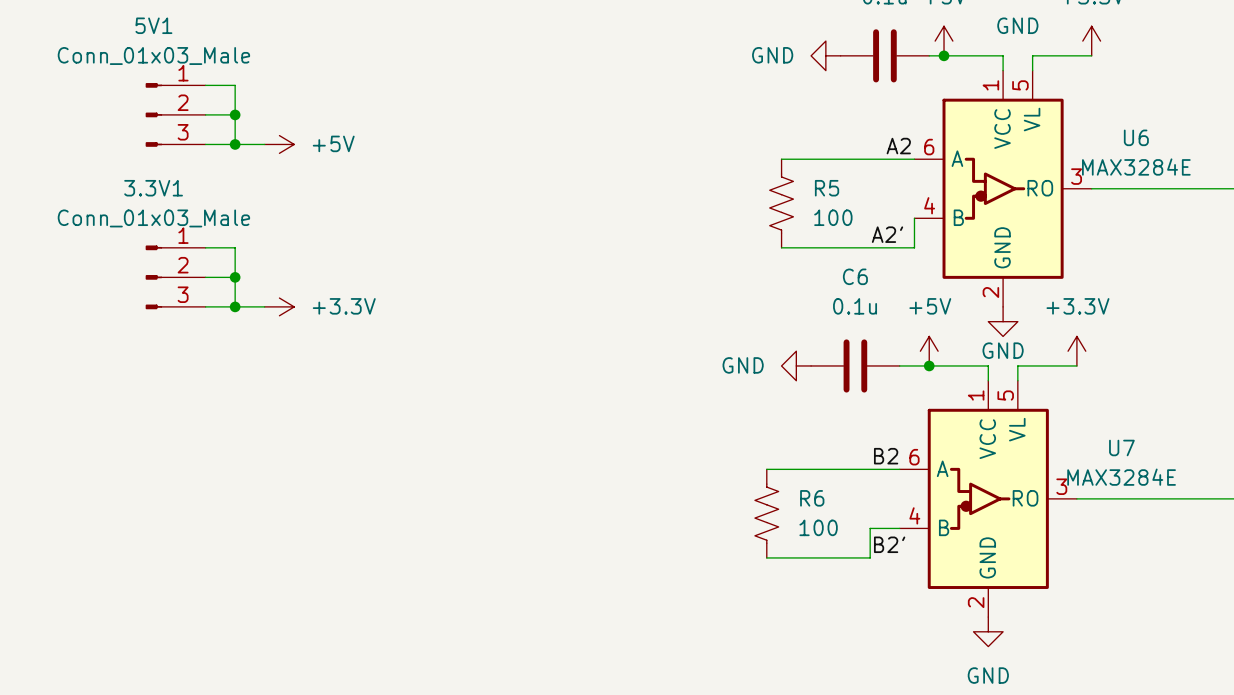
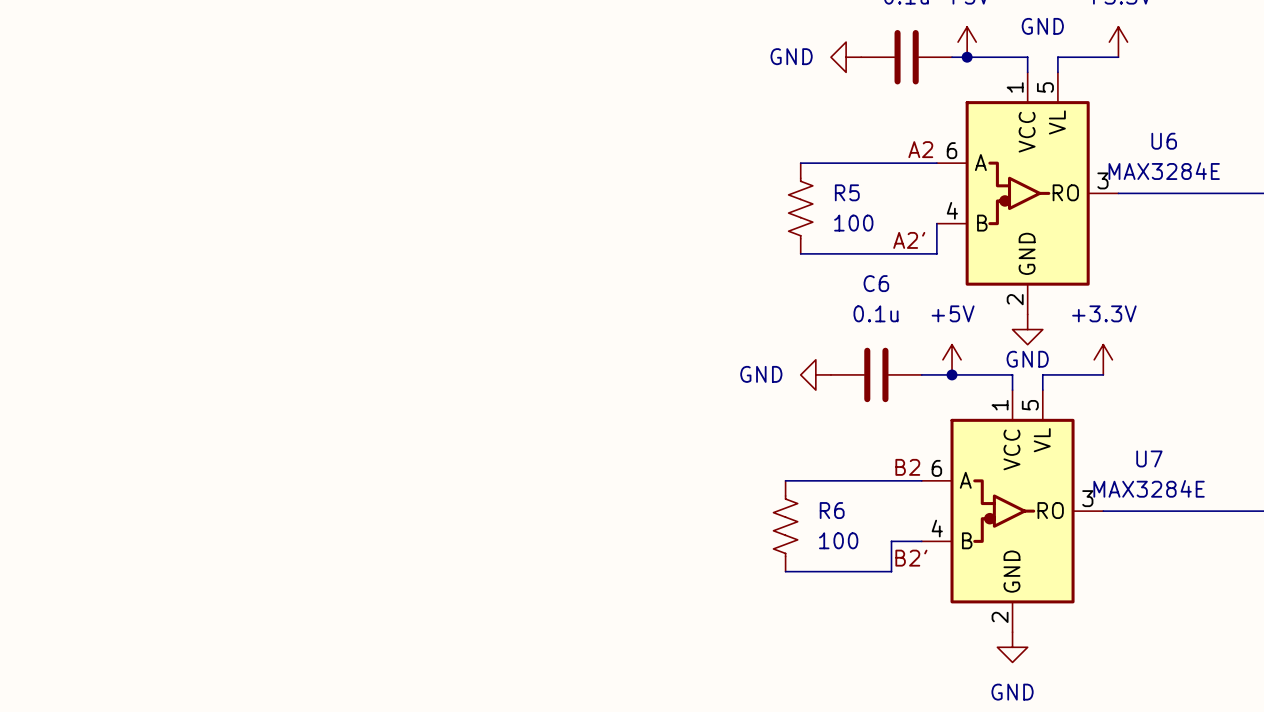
wire: (205, 85) (235, 85) (235, 144) -> none
5V1: Conn_01x03_Male (175, 114) -> none
wire: (205, 114) (235, 114) -> none
junction: (235, 114) -> none
wire: (205, 144) (264, 144) -> none
junction: (235, 144) -> none
power symbol: +5V (279, 144) -> none
wire: (205, 247) (235, 247) (235, 306) -> none
3.3V1: Conn_01x03_Male (175, 277) -> none
wire: (205, 277) (235, 277) -> none
junction: (235, 277) -> none
wire: (205, 306) (264, 306) -> none
junction: (235, 306) -> none
power symbol: +3.3V (279, 306) -> none

